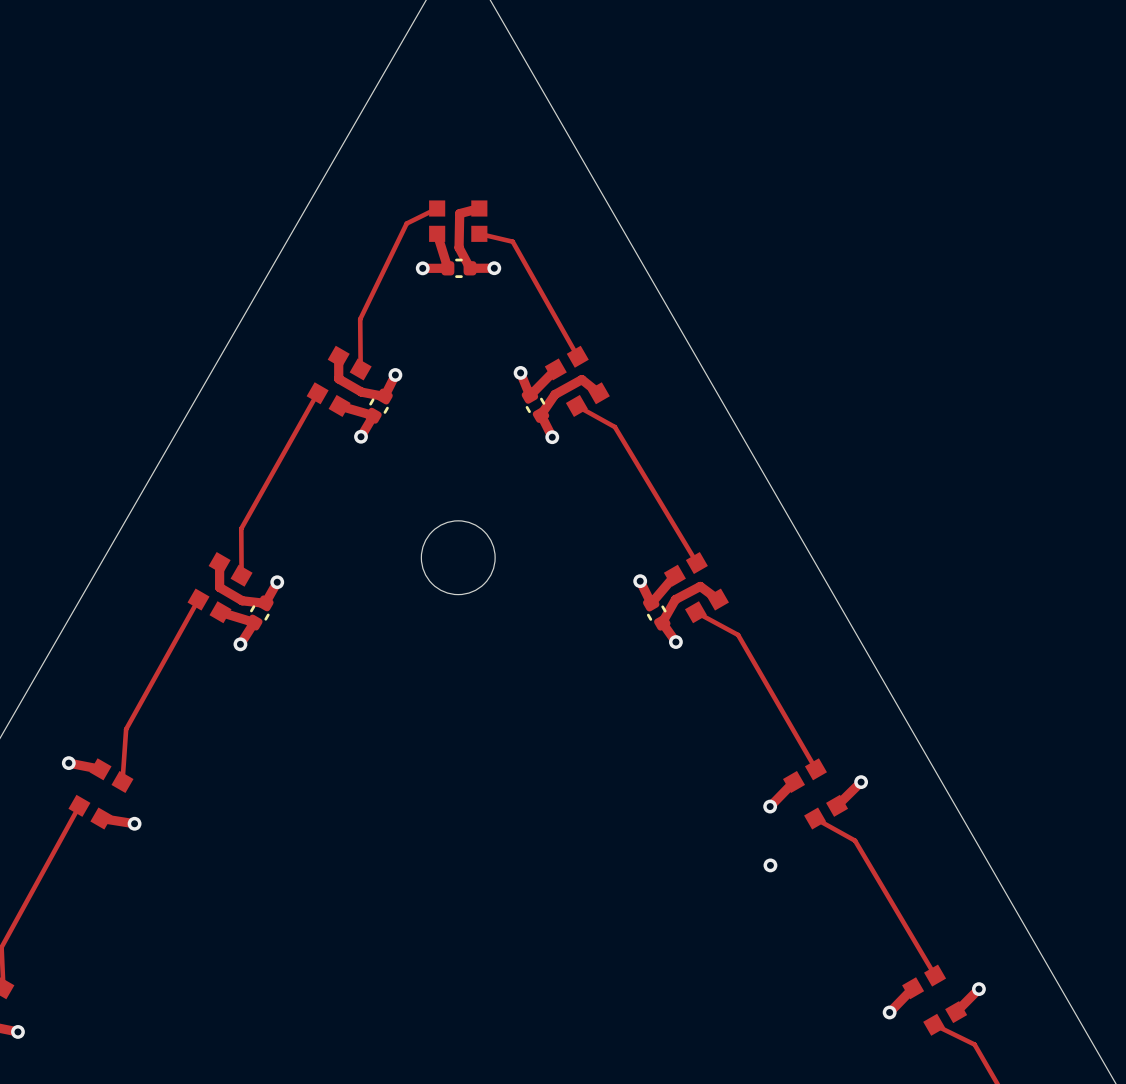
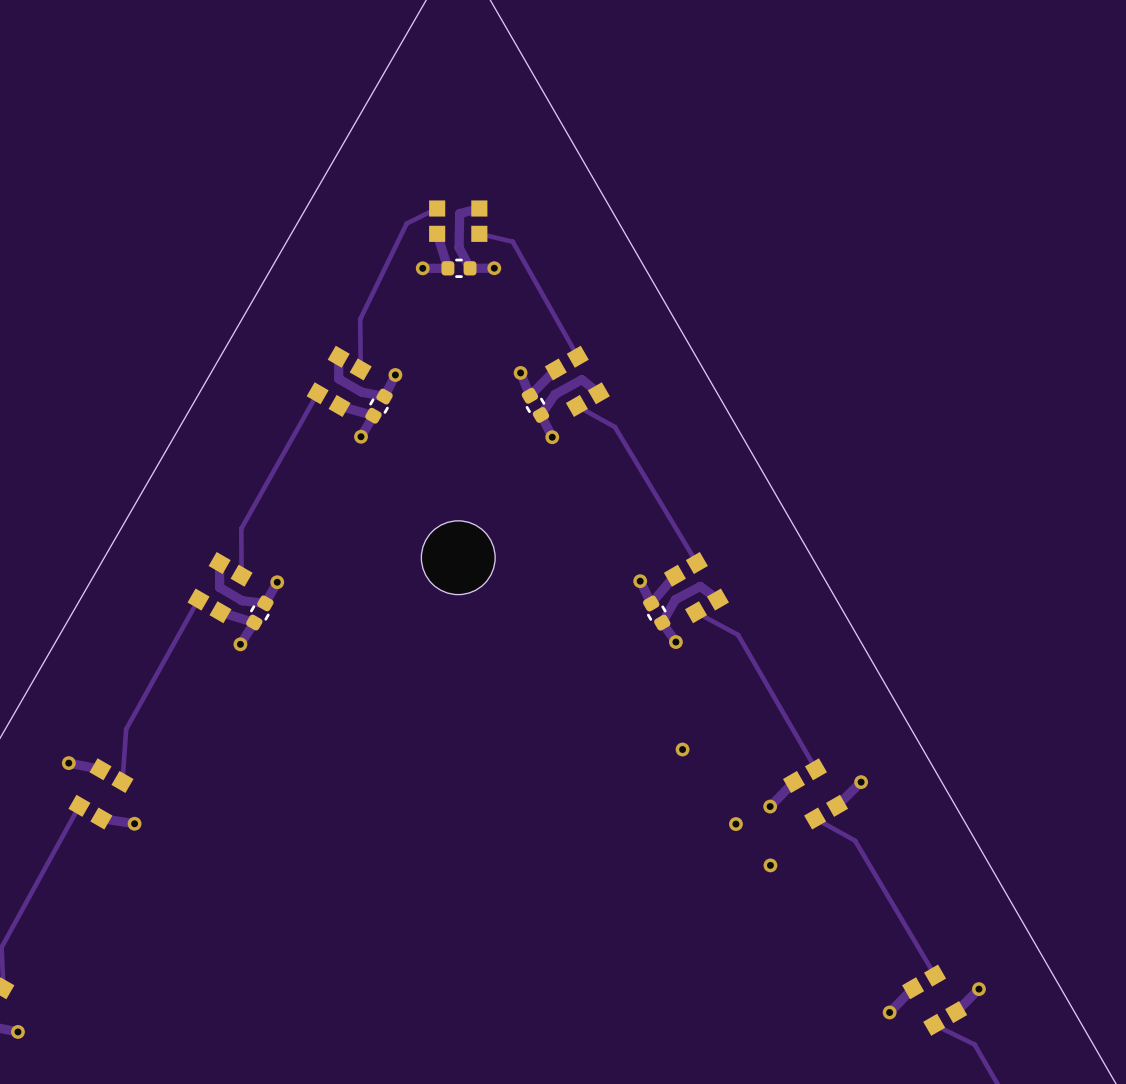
via: none -> (682, 749)
via: none -> (735, 824)

